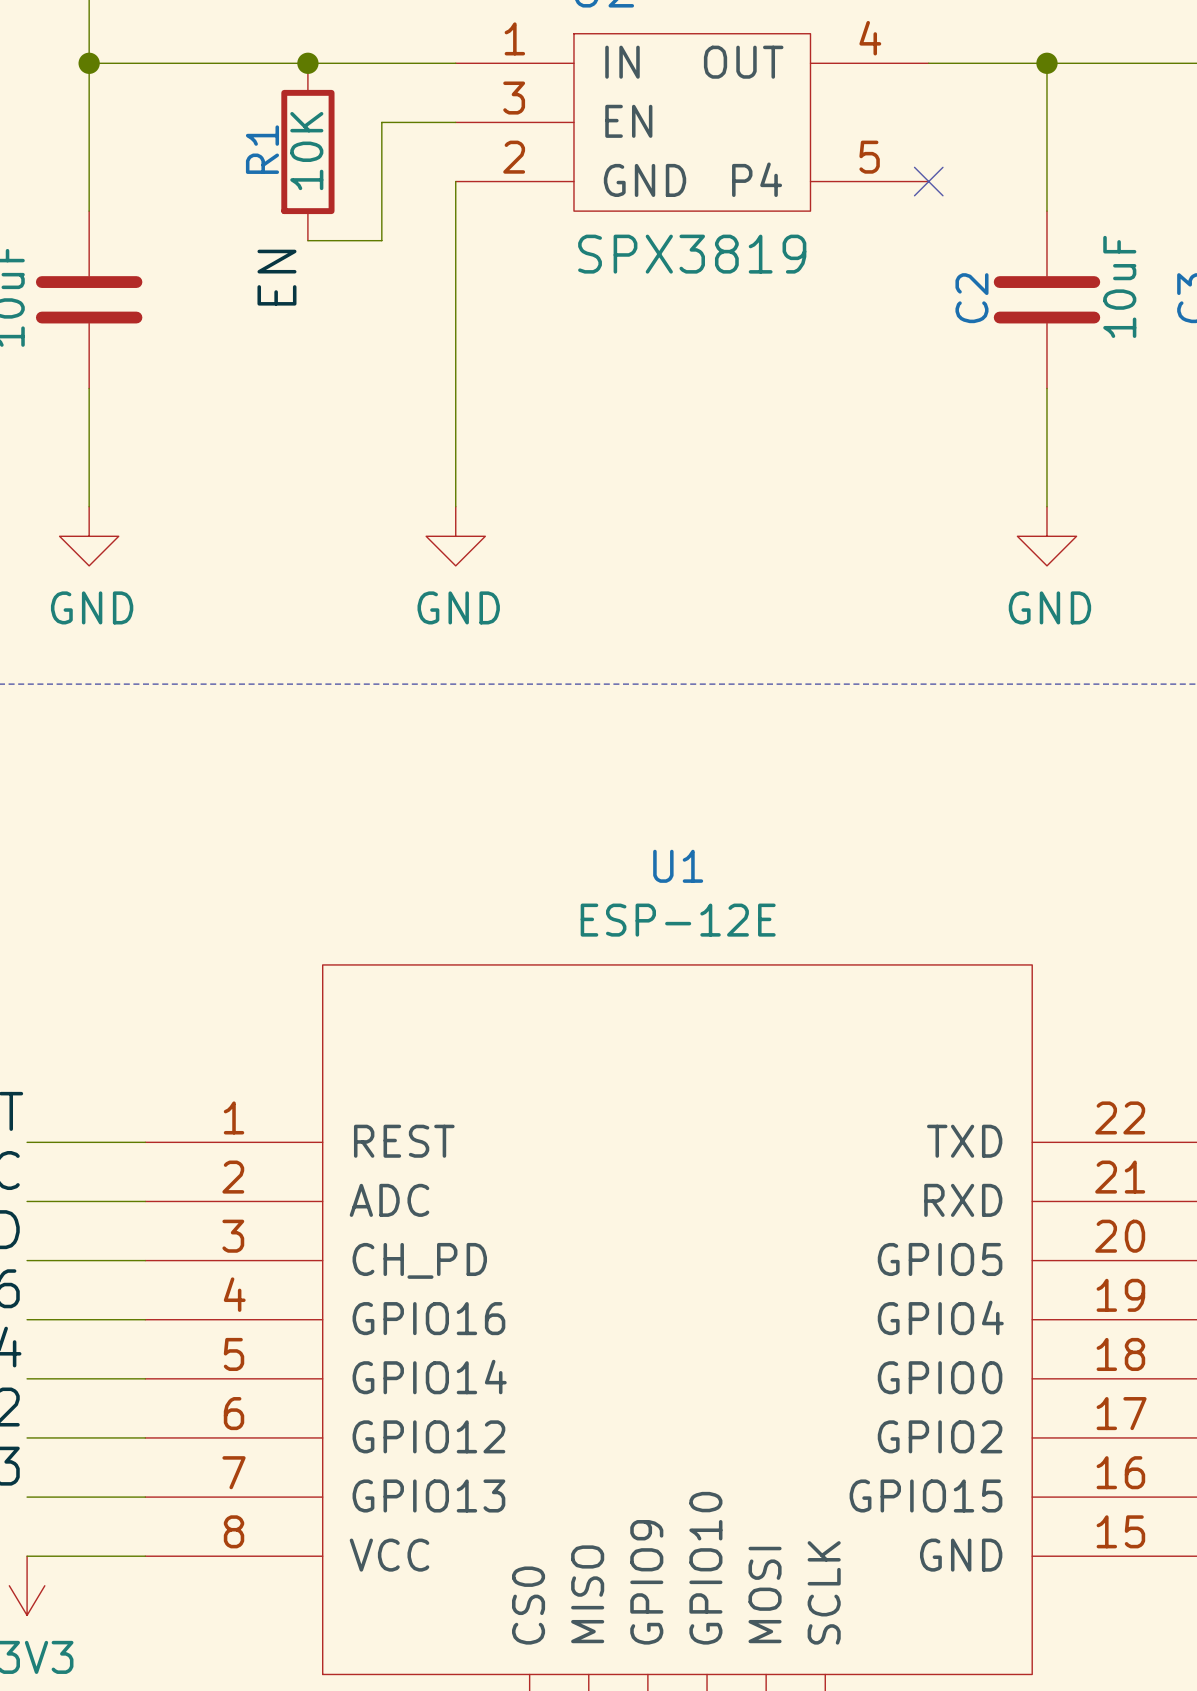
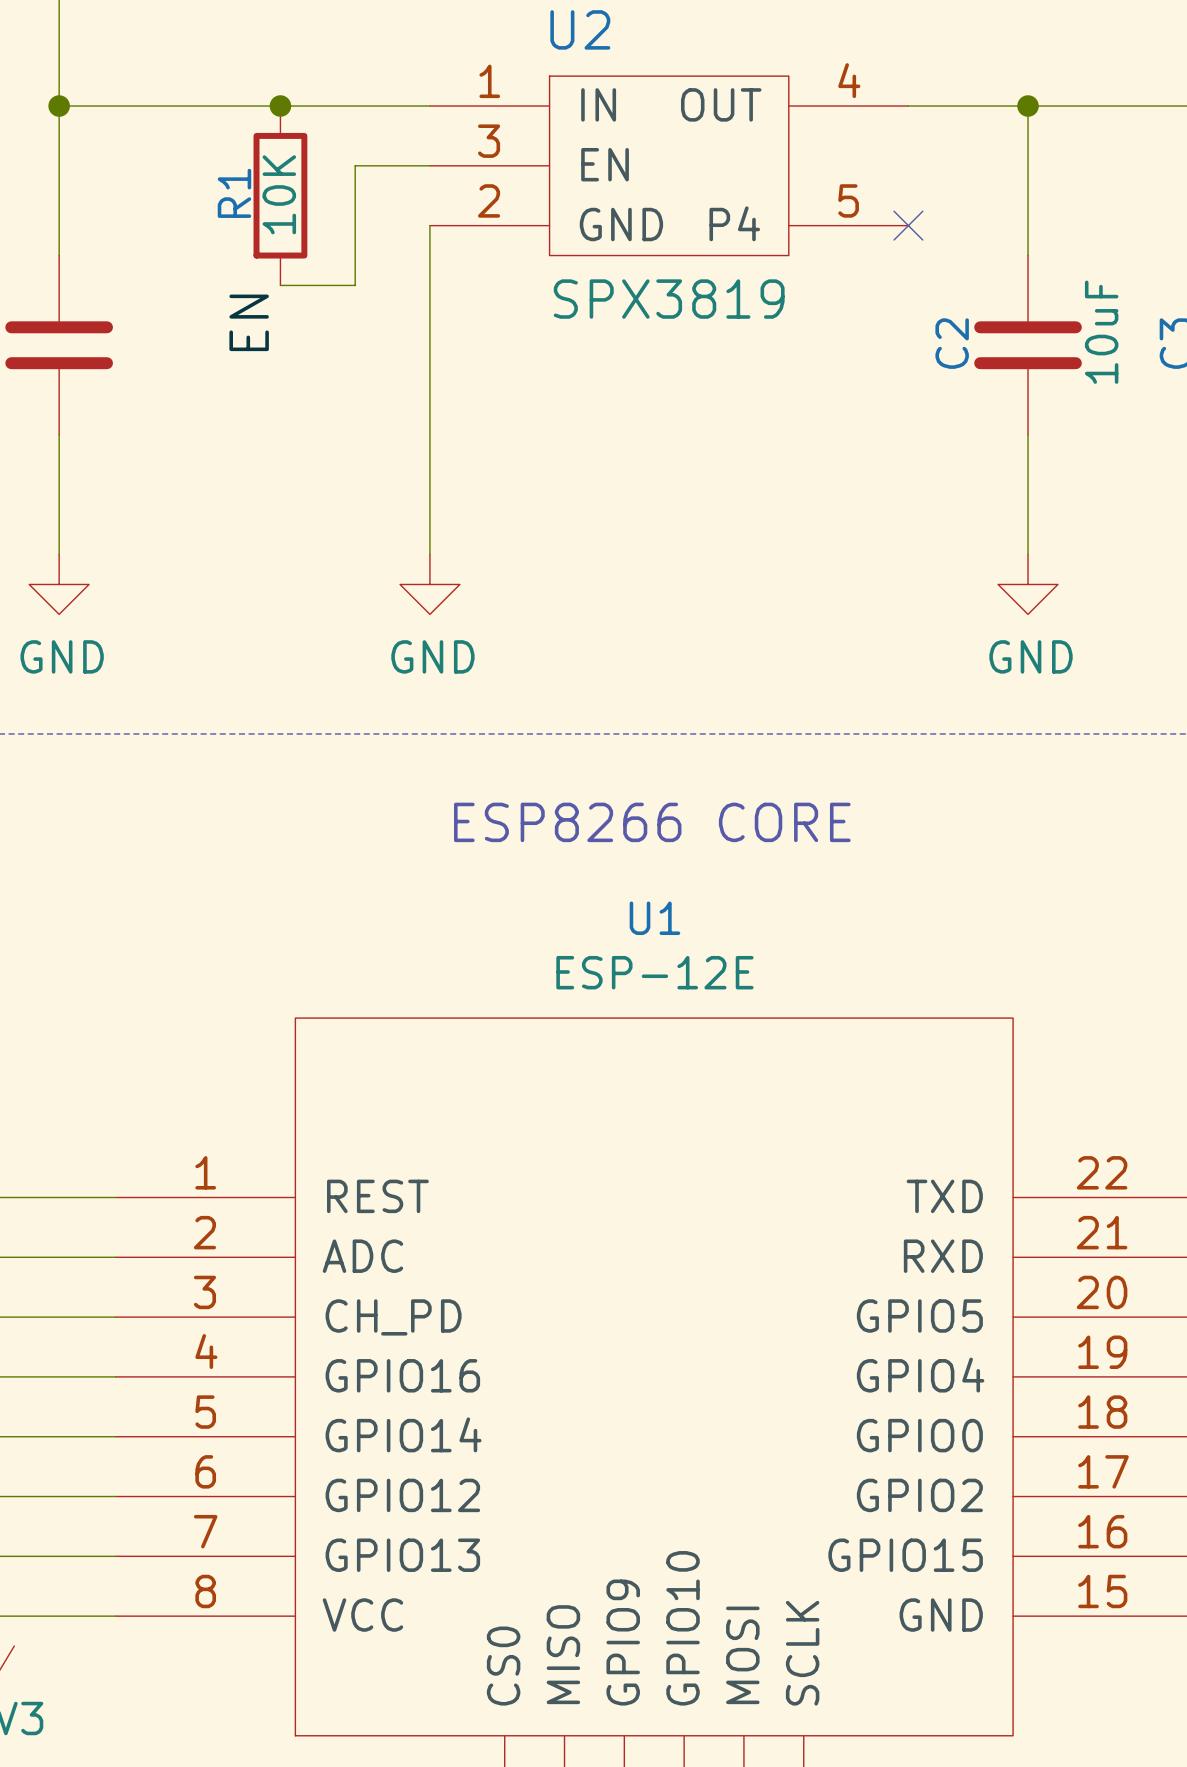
text: none -> ESP8266 CORE (652, 822)

